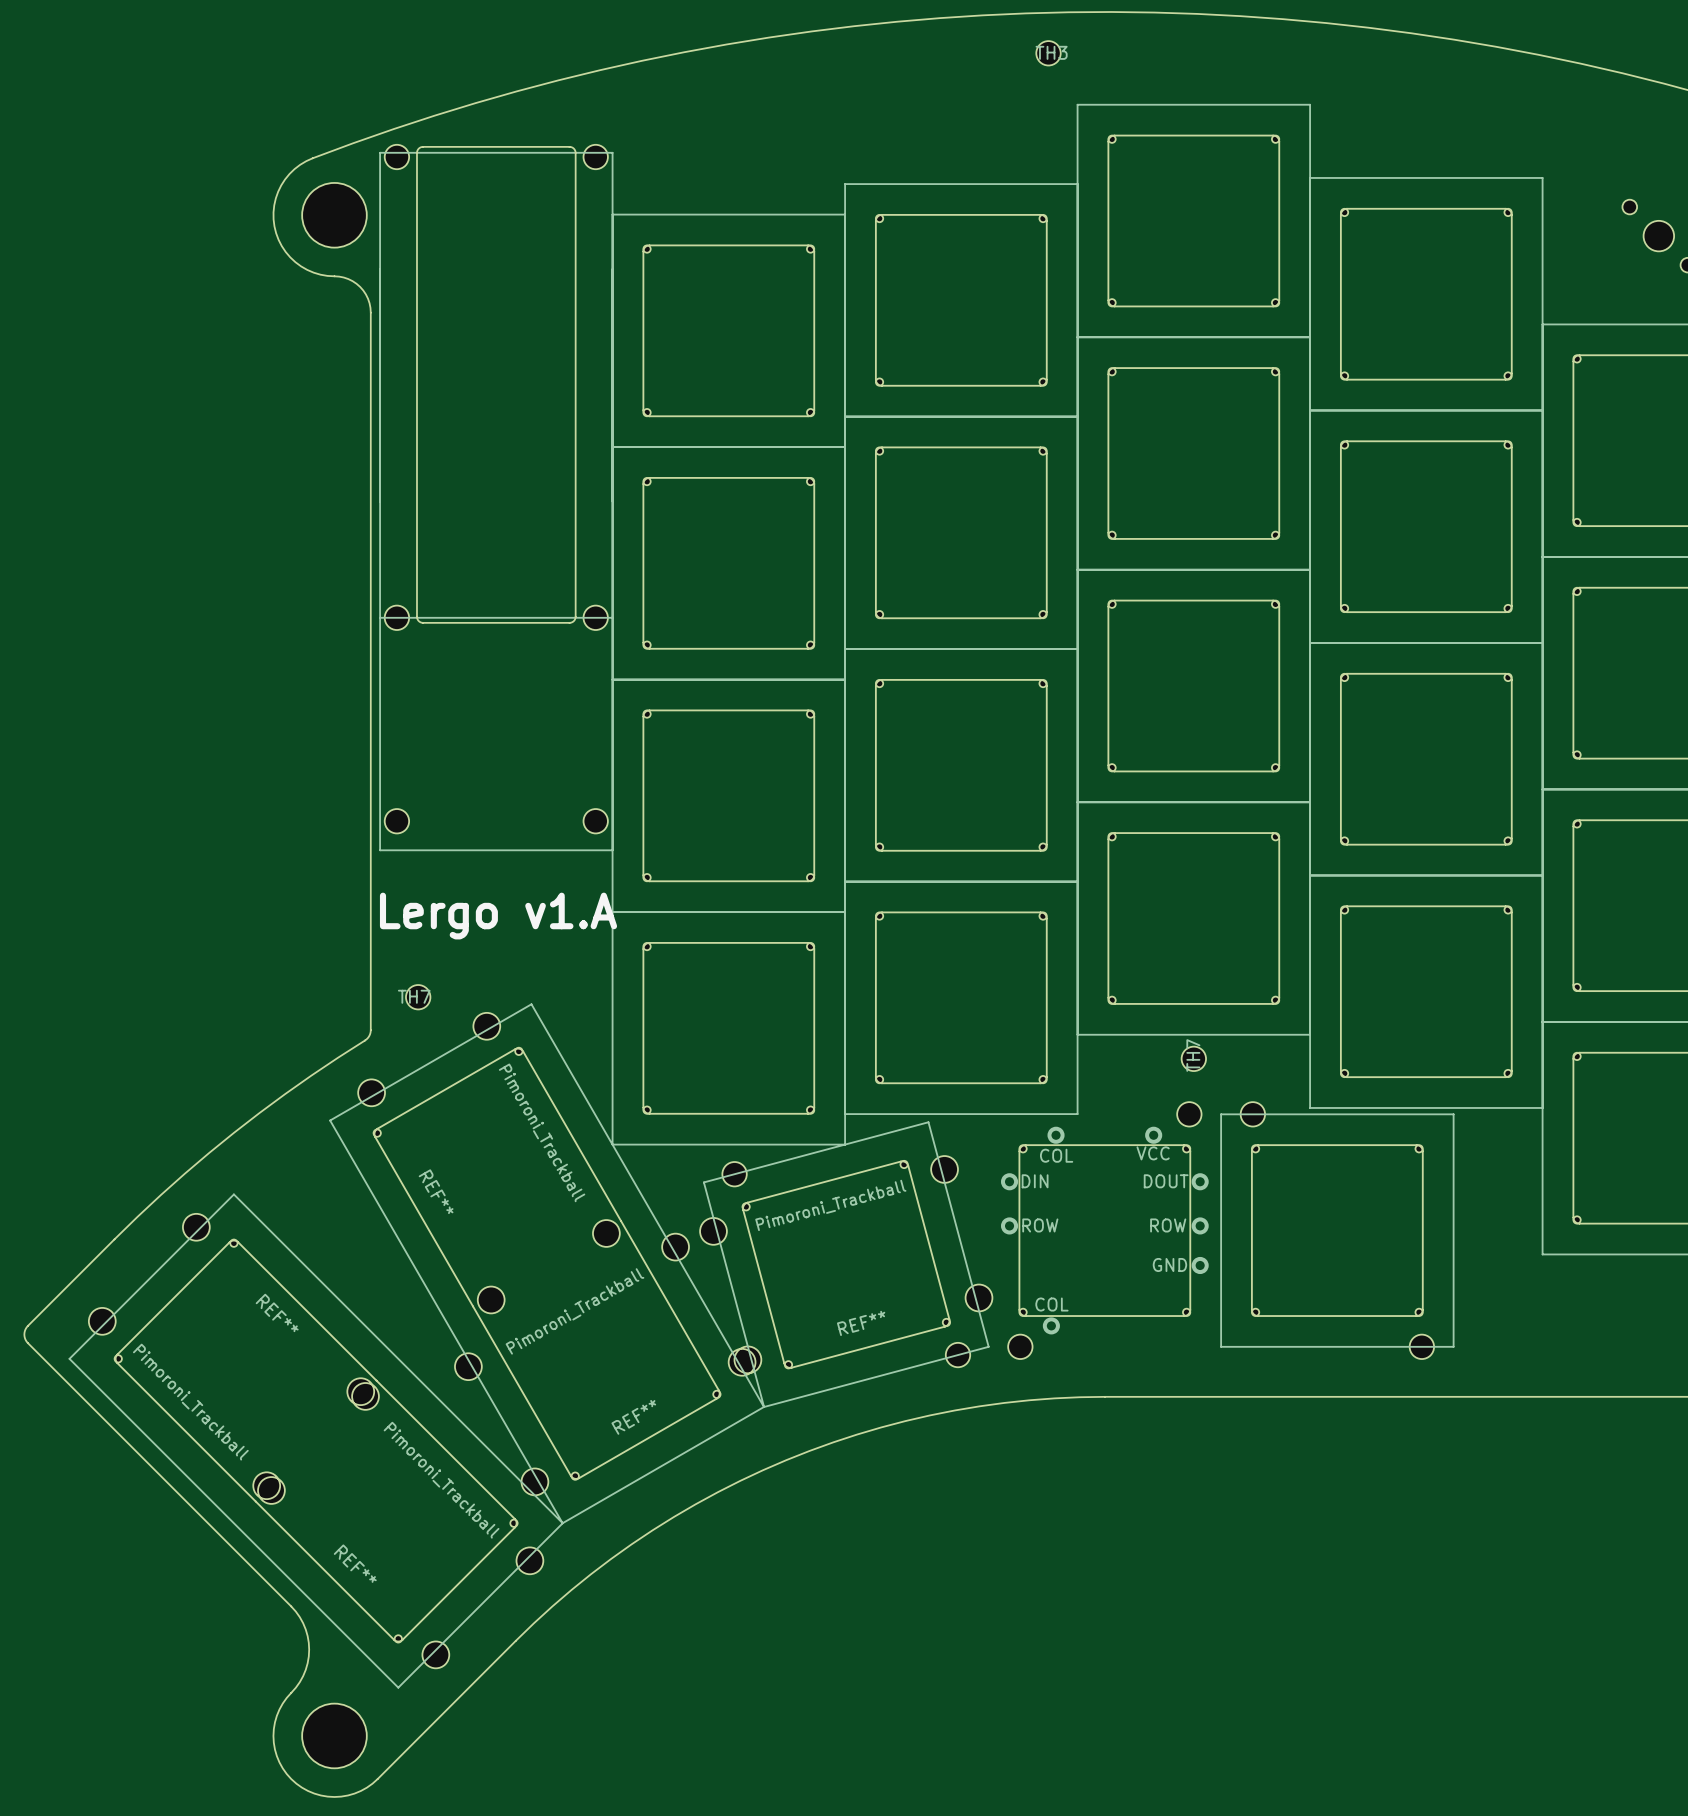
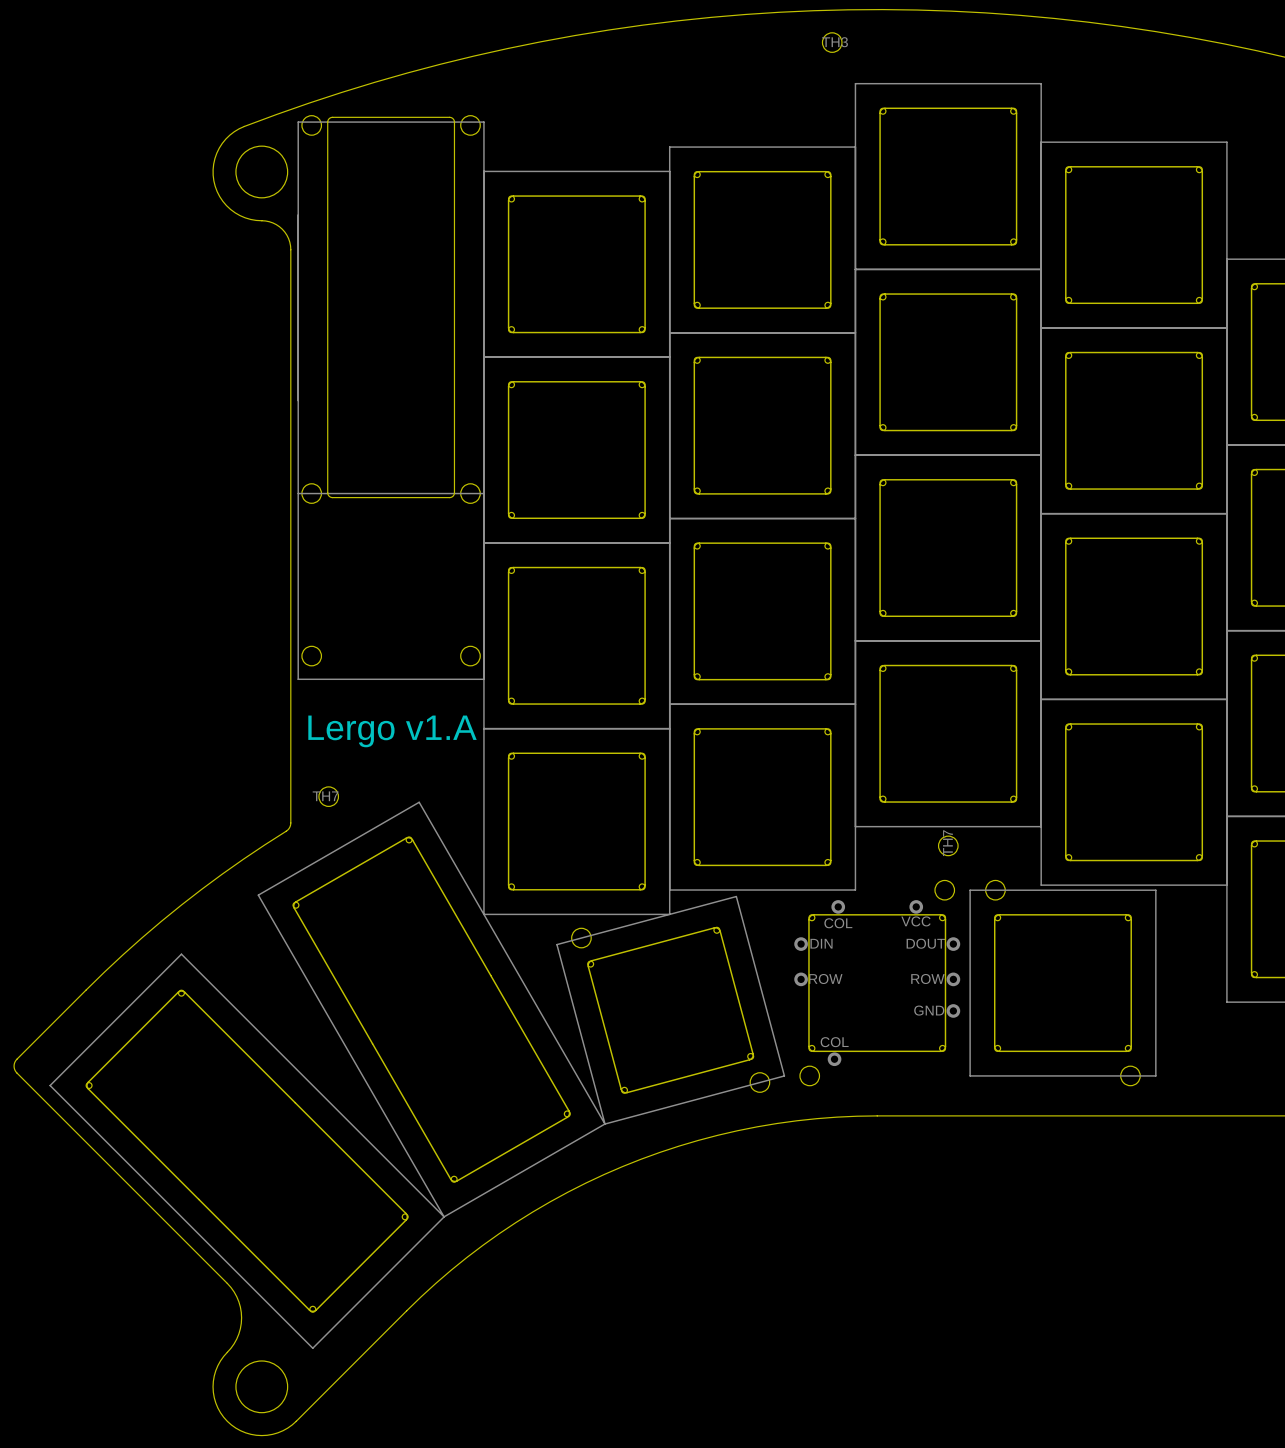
REF**: Pimoroni_Trackball (489, 1163) -> none
REF**: Pimoroni_Trackball (846, 1264) -> none
REF**: Pimoroni_Trackball (233, 1358) -> none
REF**: Pimoroni_Trackball (605, 1364) -> none
REF**: Pimoroni_Trackball (398, 1523) -> none

